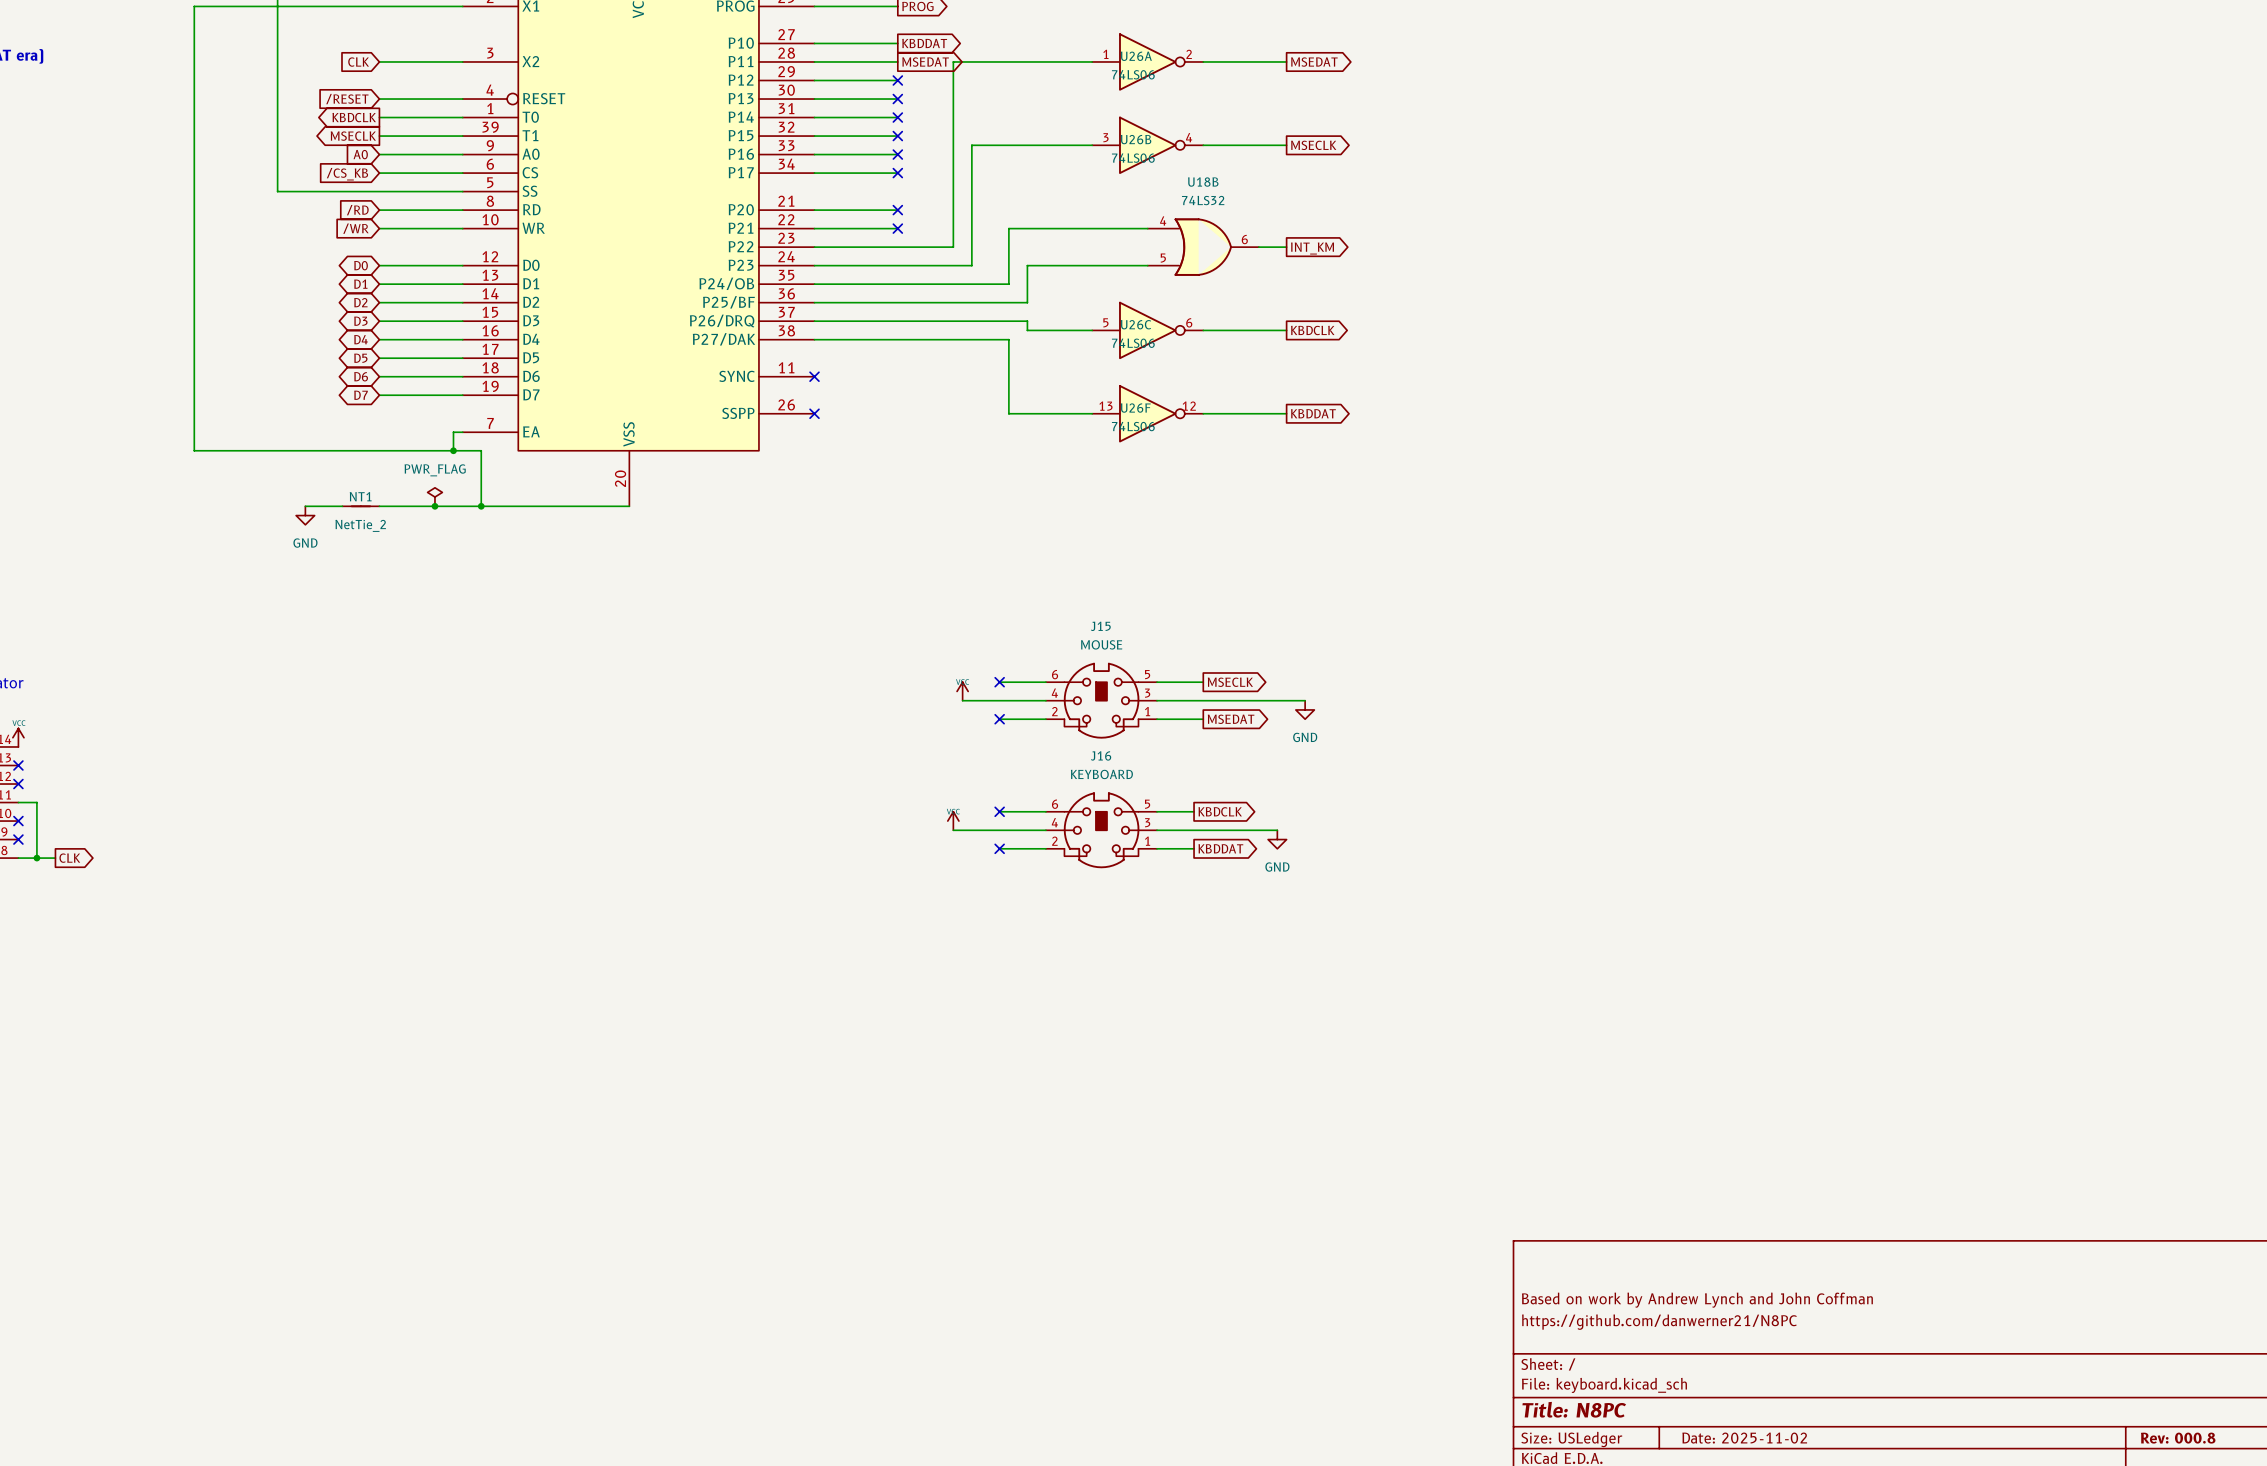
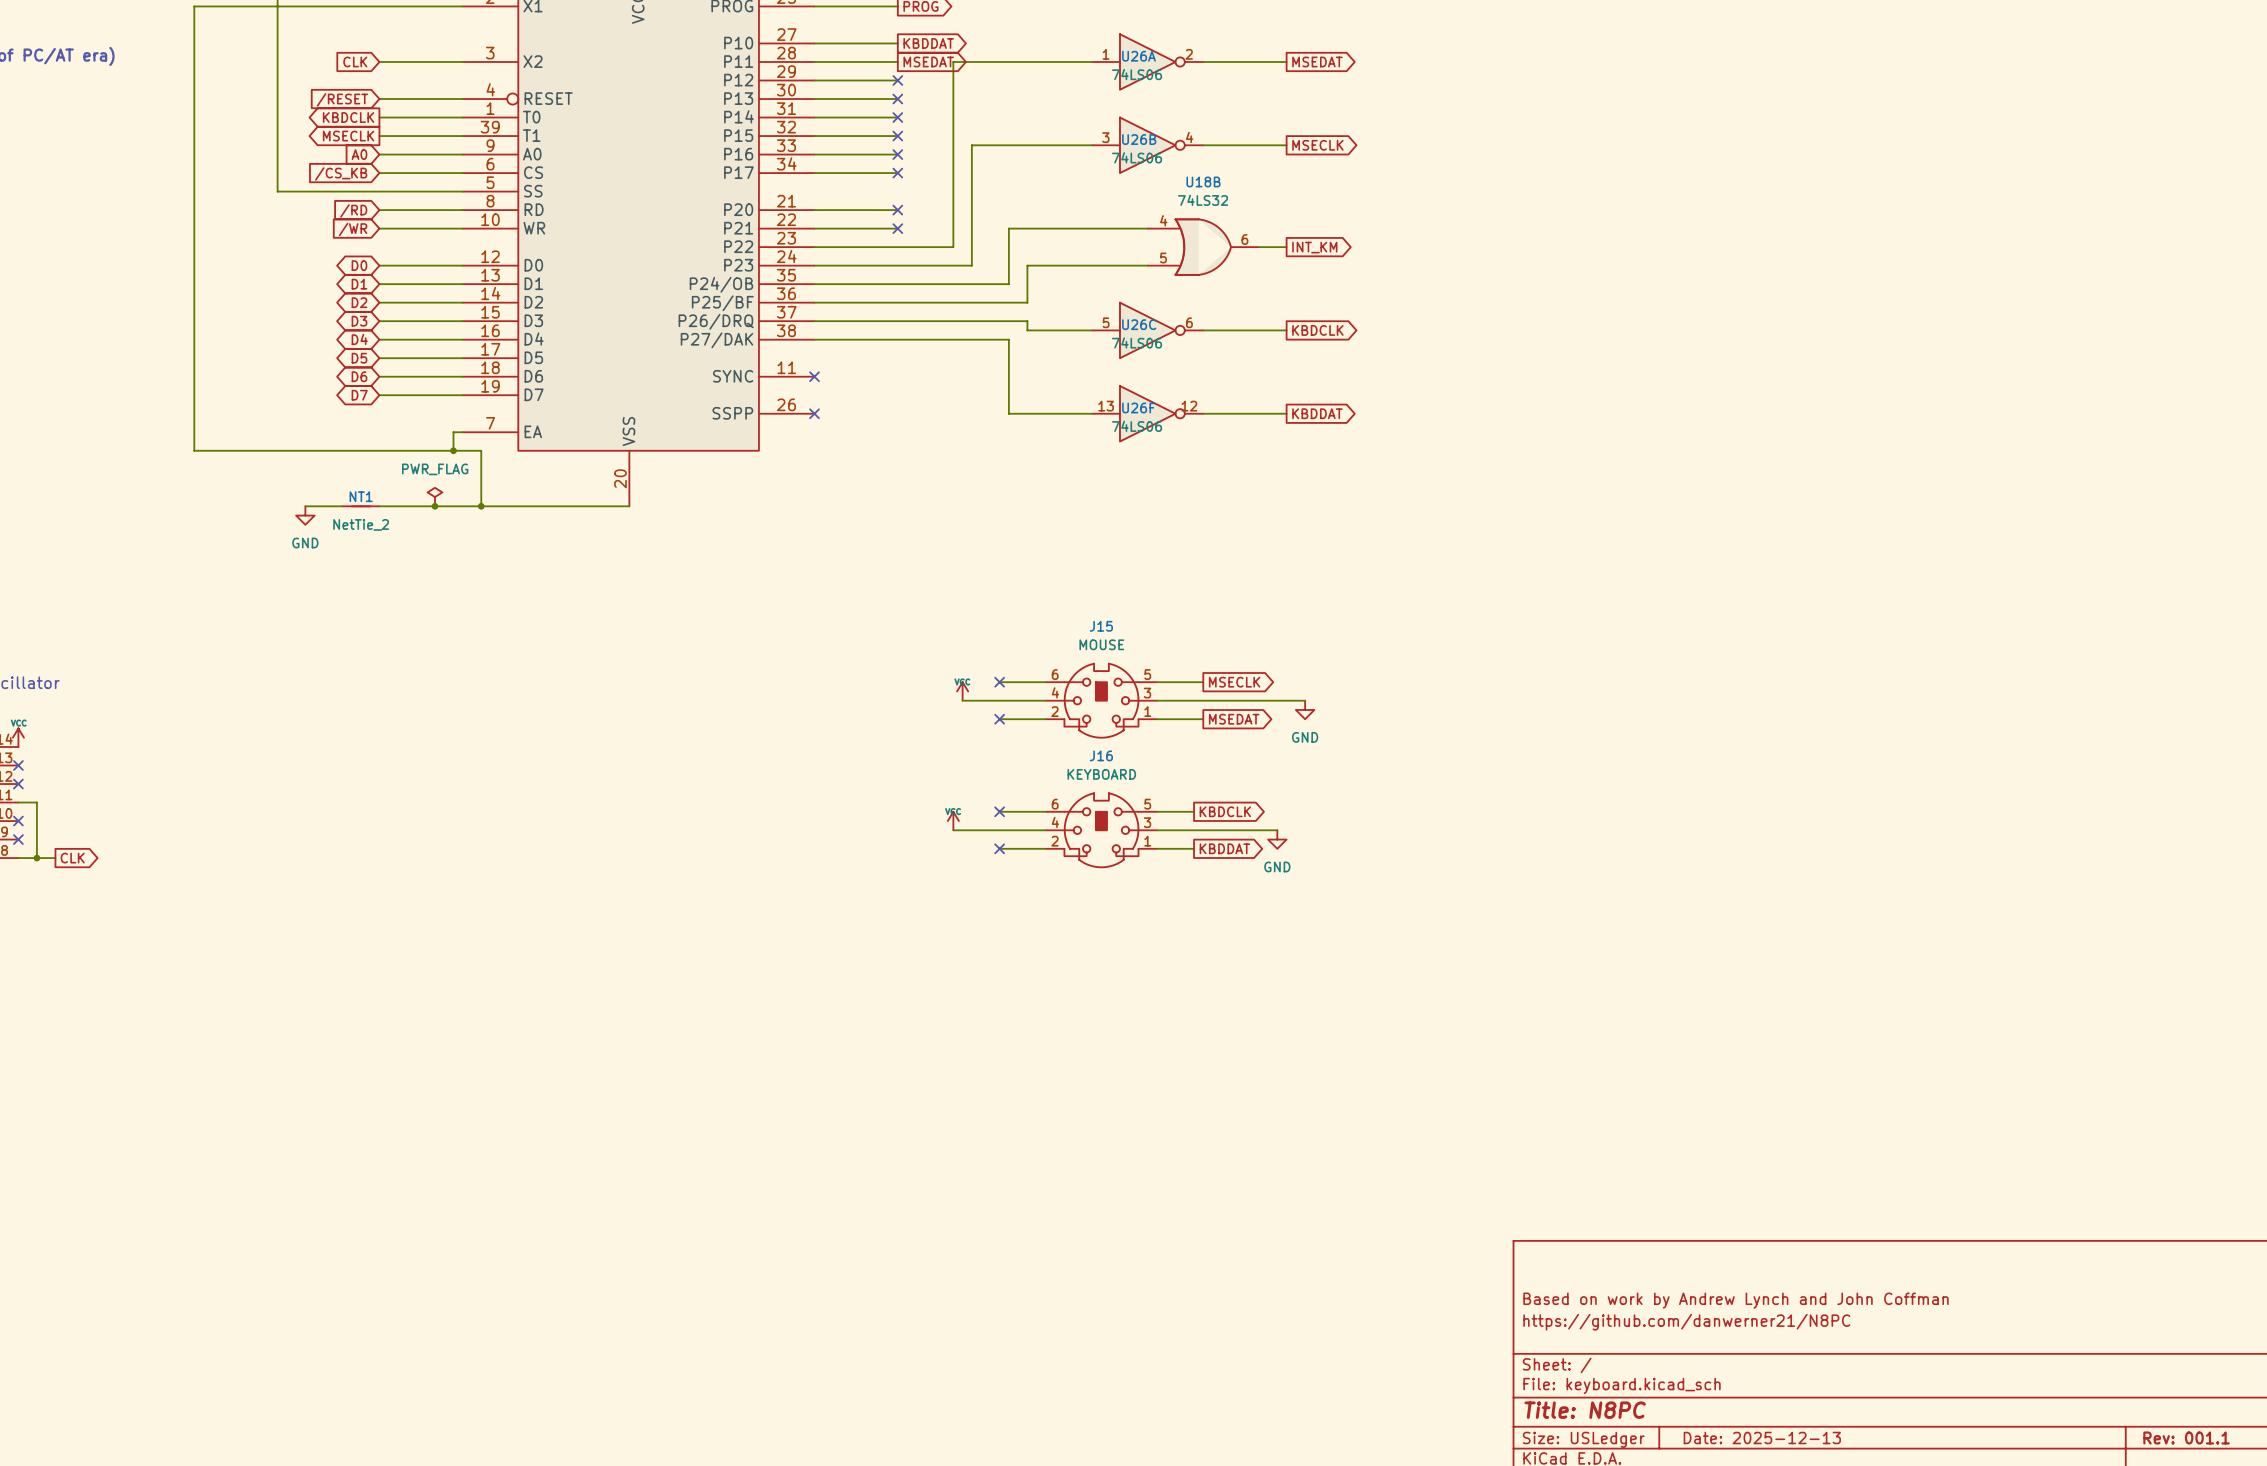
title block: Date: 2025-11-02 (1744, 1438) -> Date: 2025-12-13 (1762, 1437)
title block: Rev: 000.8 (2178, 1438) -> Rev: 001.1 (2186, 1437)

